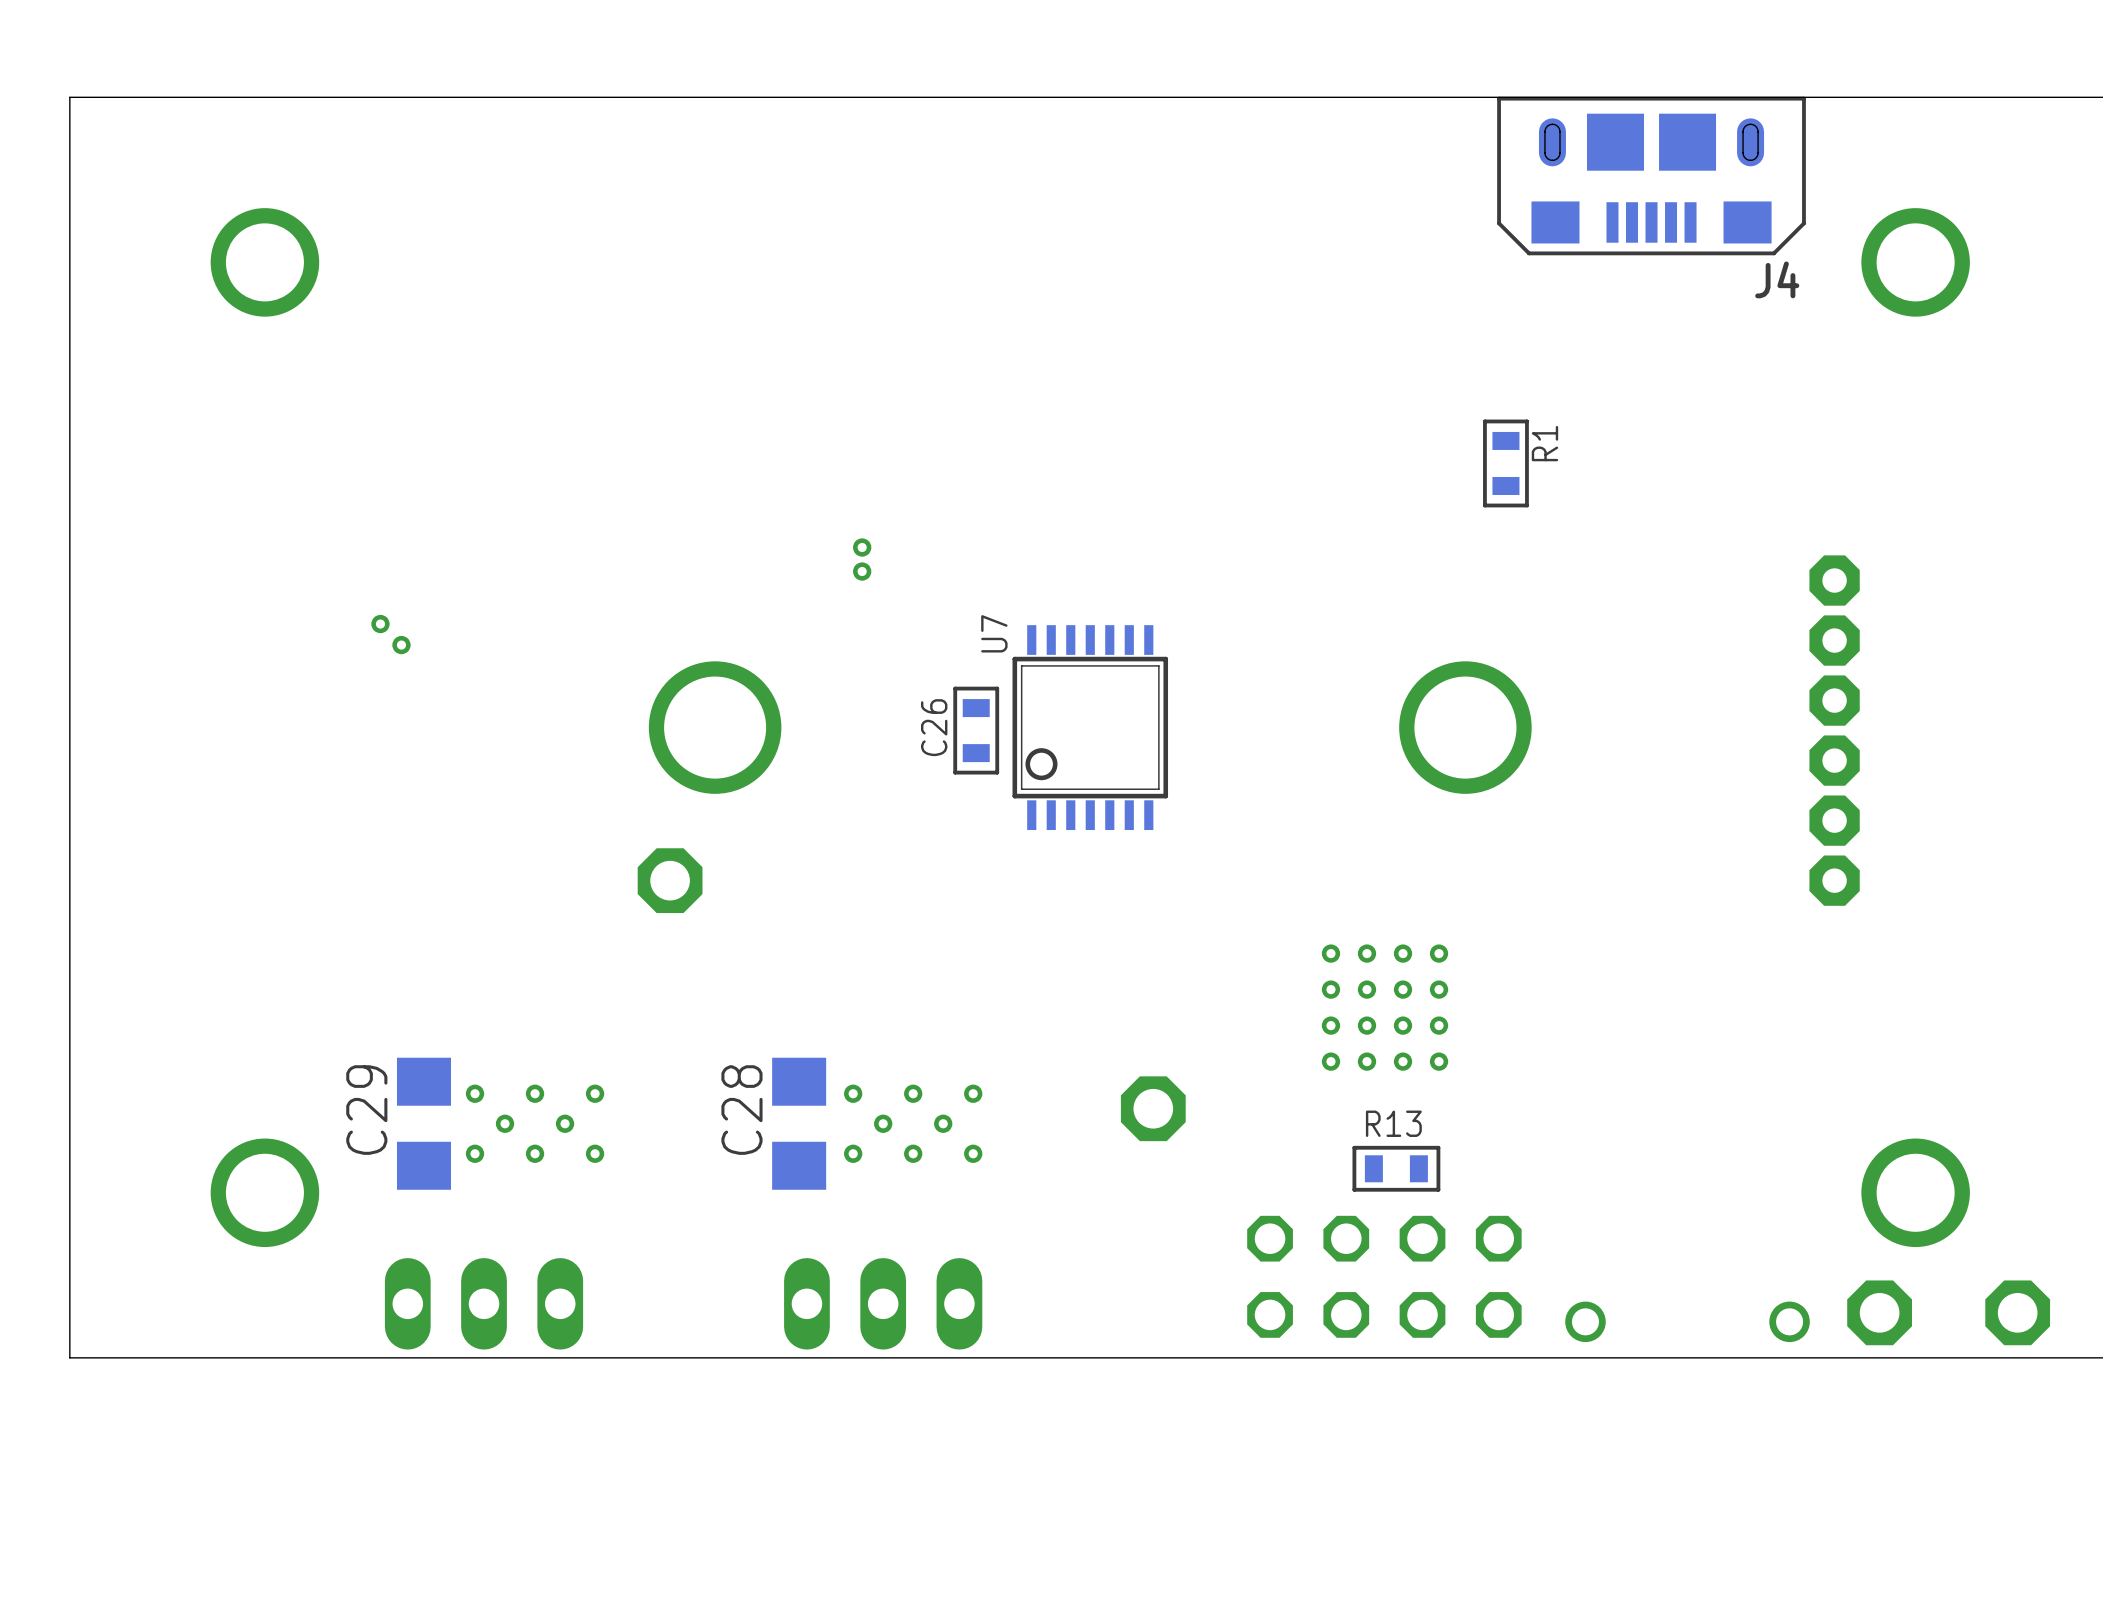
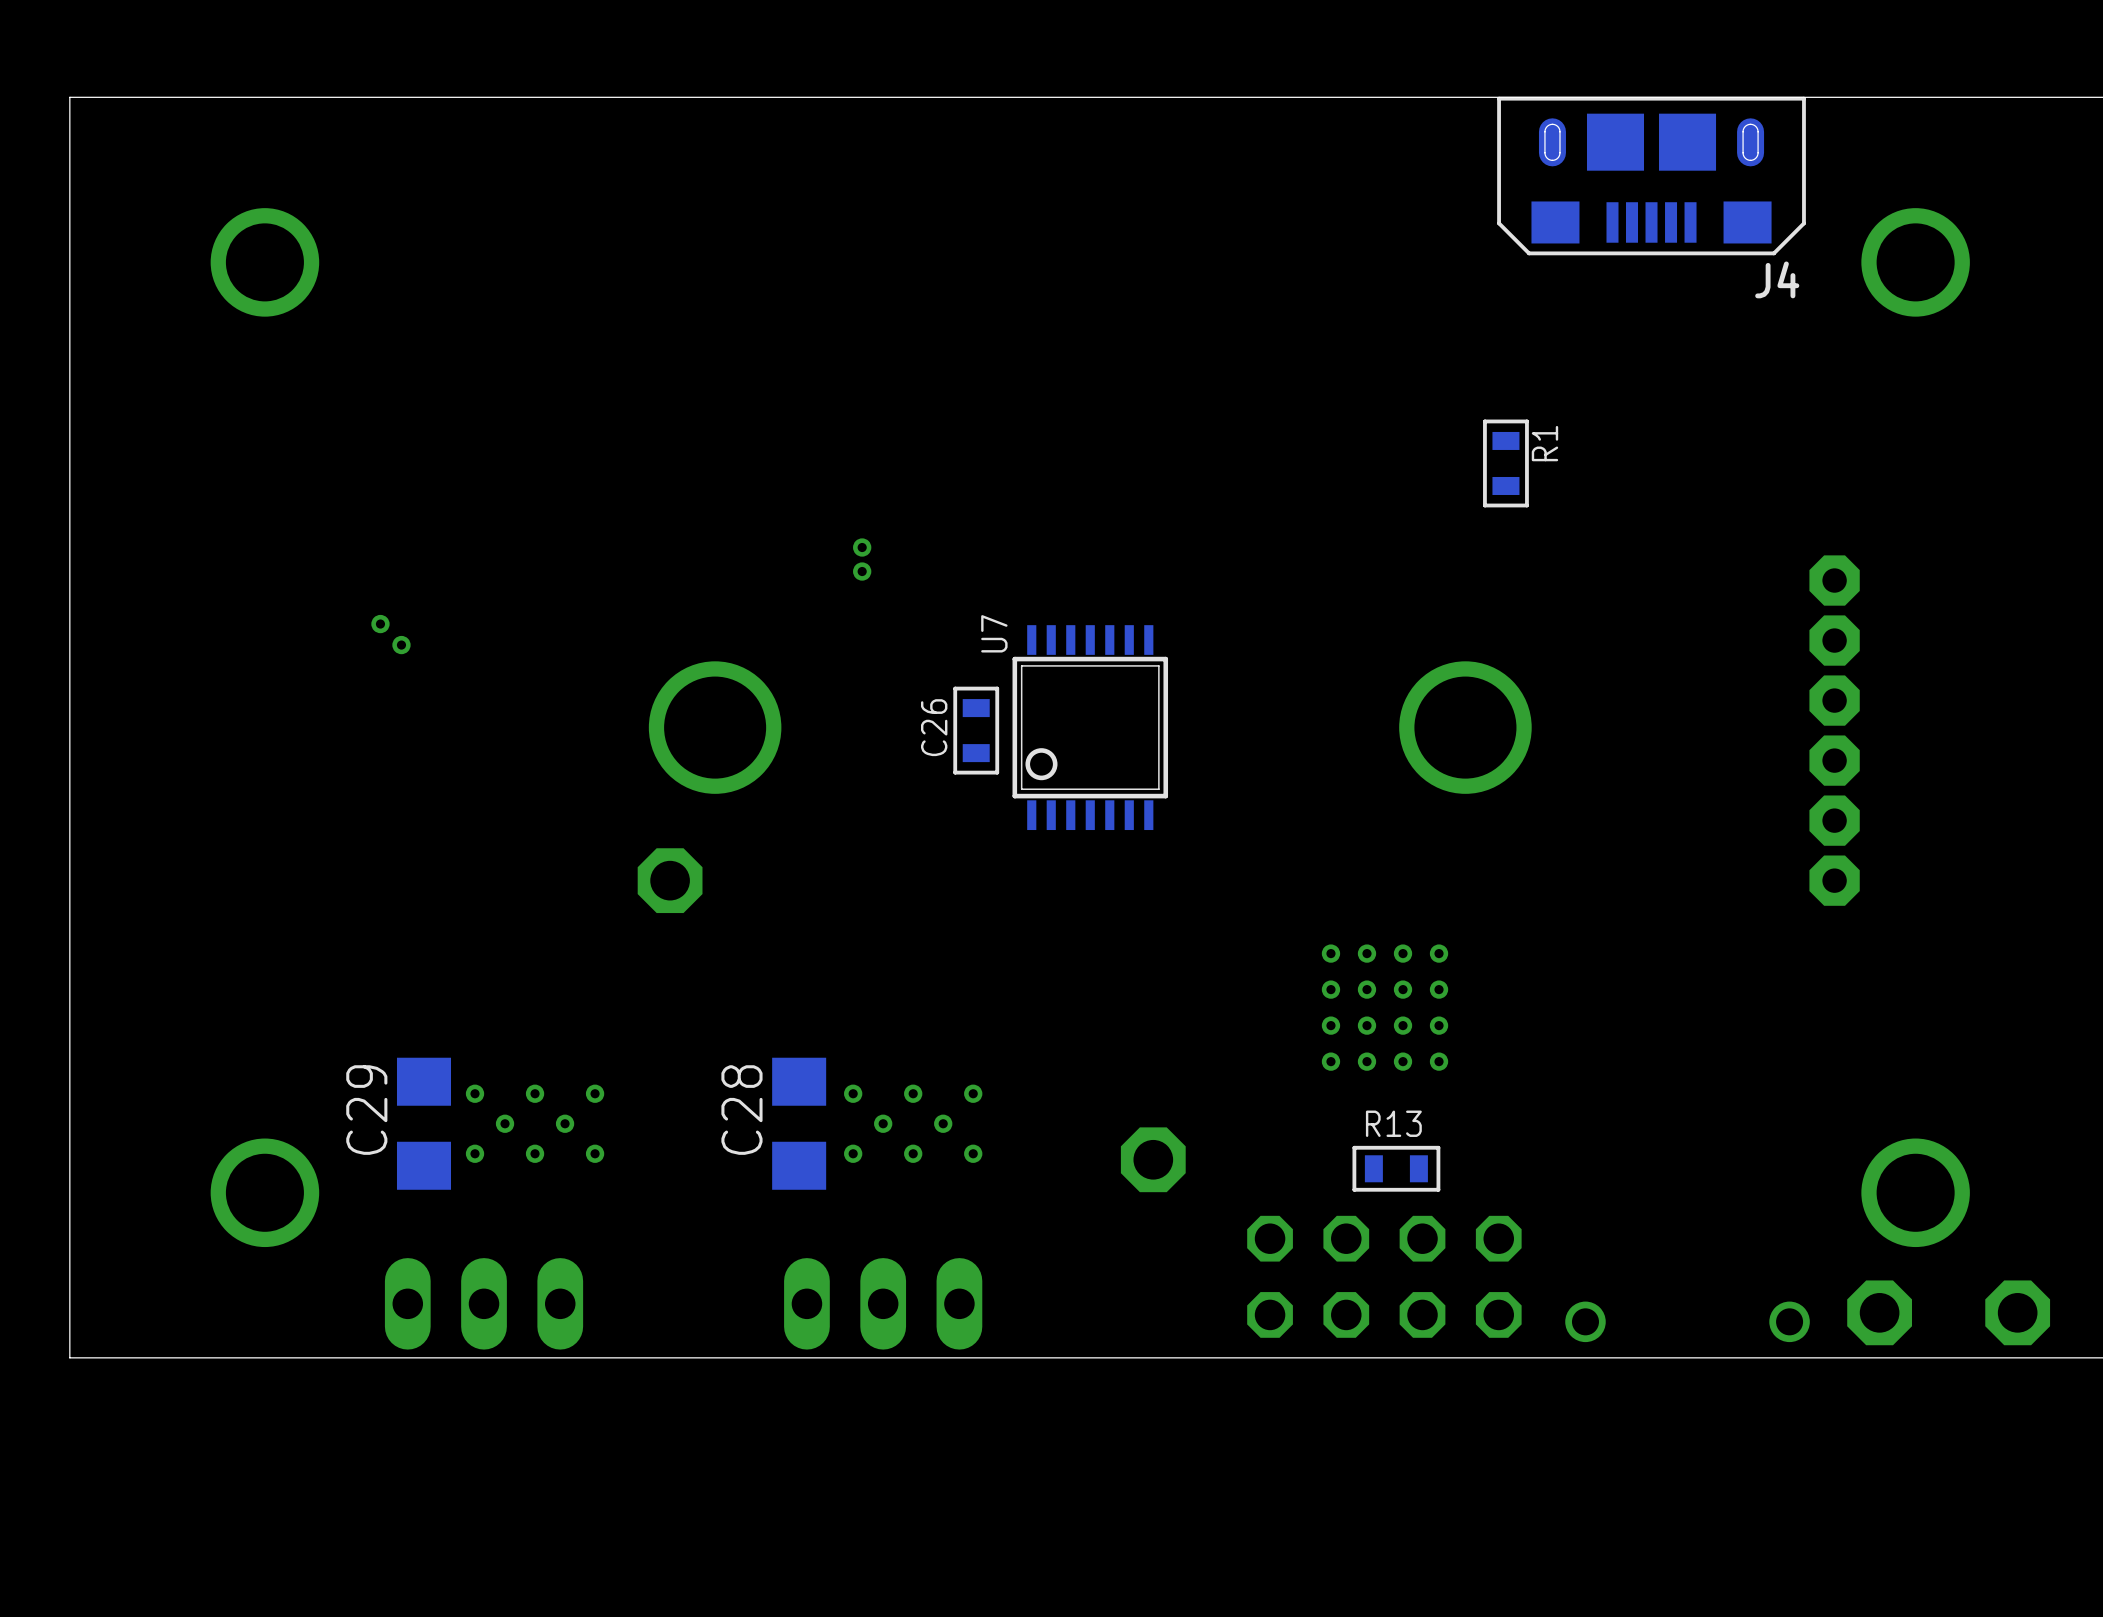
part position: (1153, 1108) -> (1153, 1159)

